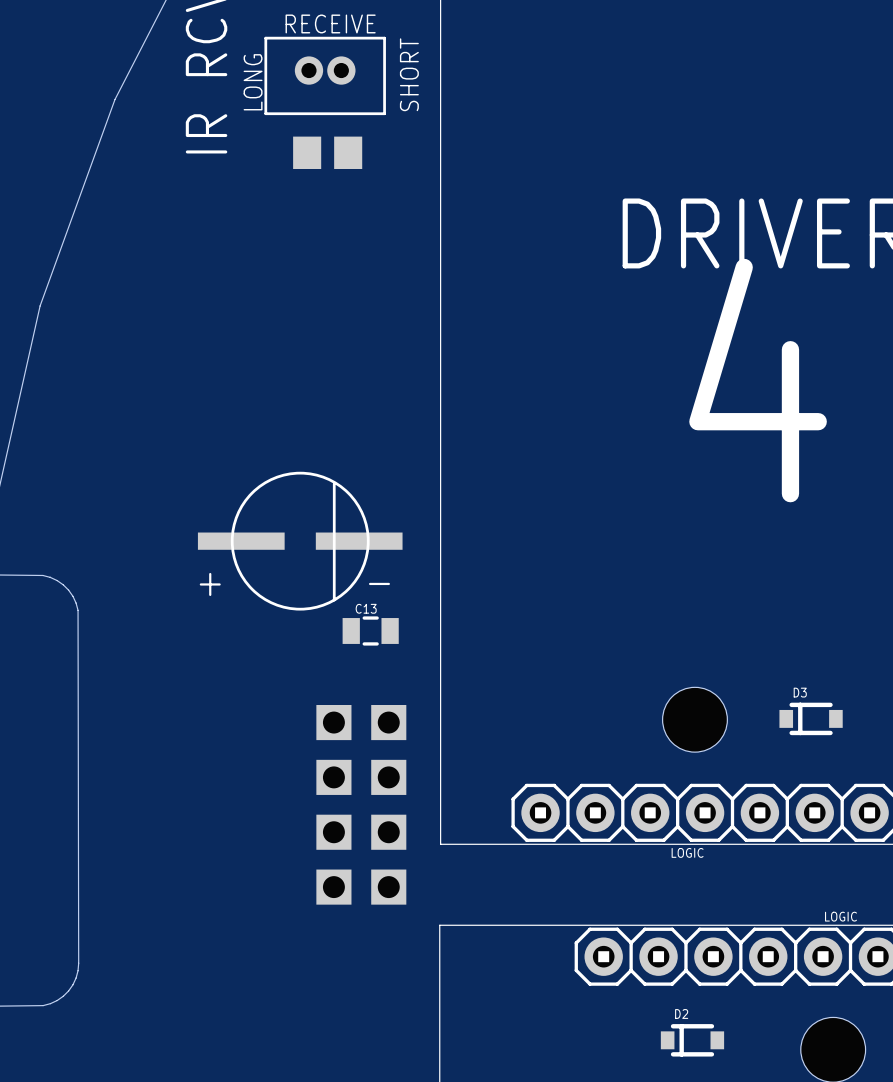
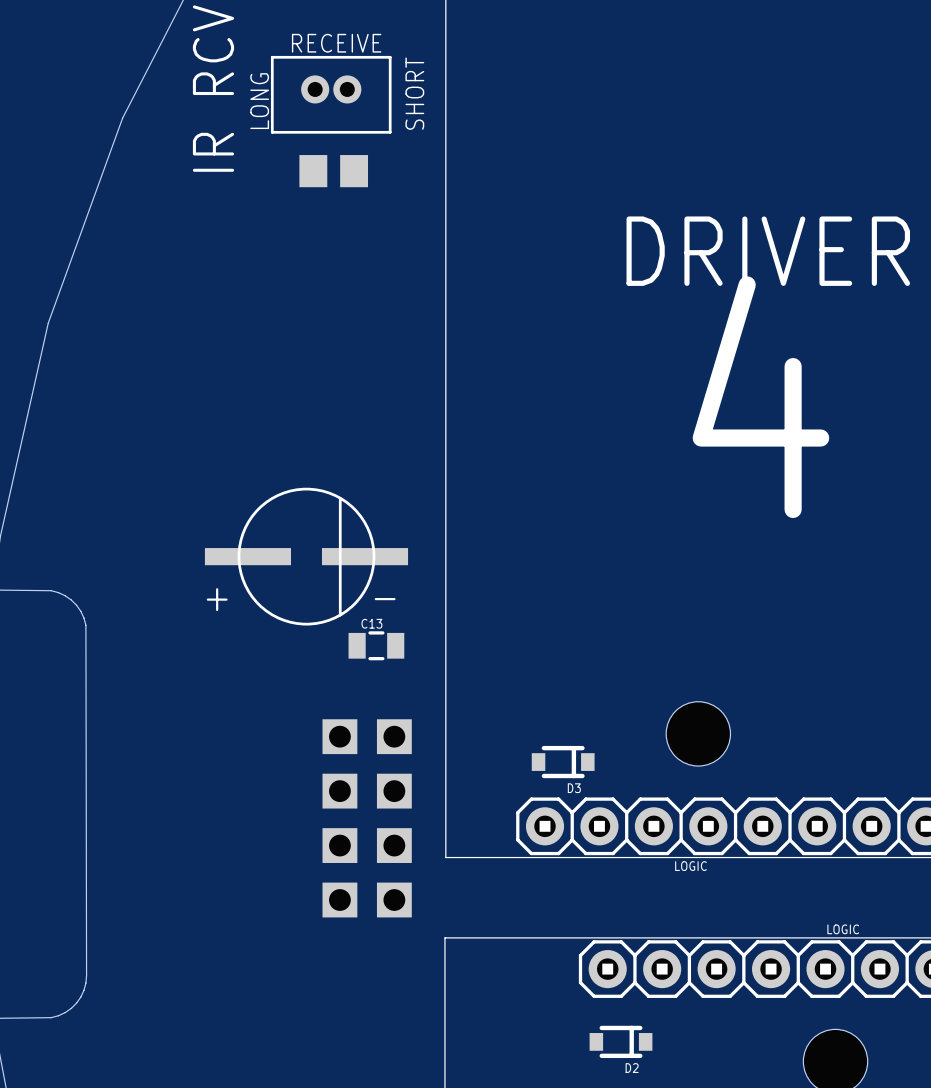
D3 rotation: 0° (811, 718) -> 180° (563, 762)
D3 position: (811, 718) -> (563, 762)
D2 rotation: 0° (692, 1040) -> 180° (621, 1041)
D2 position: (692, 1040) -> (621, 1041)

